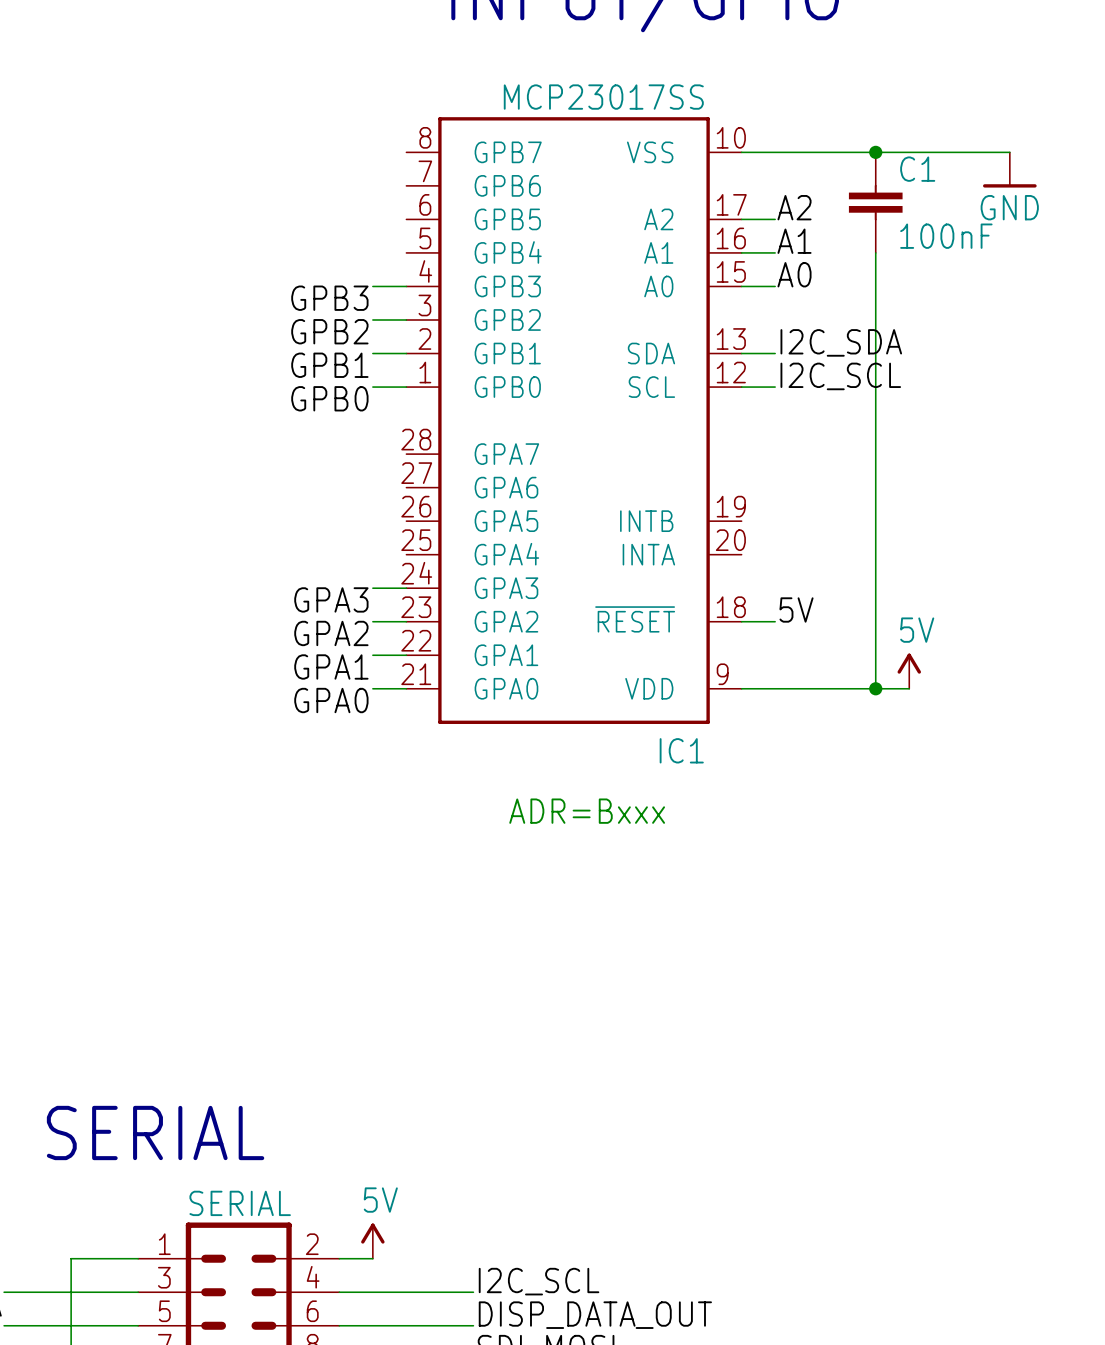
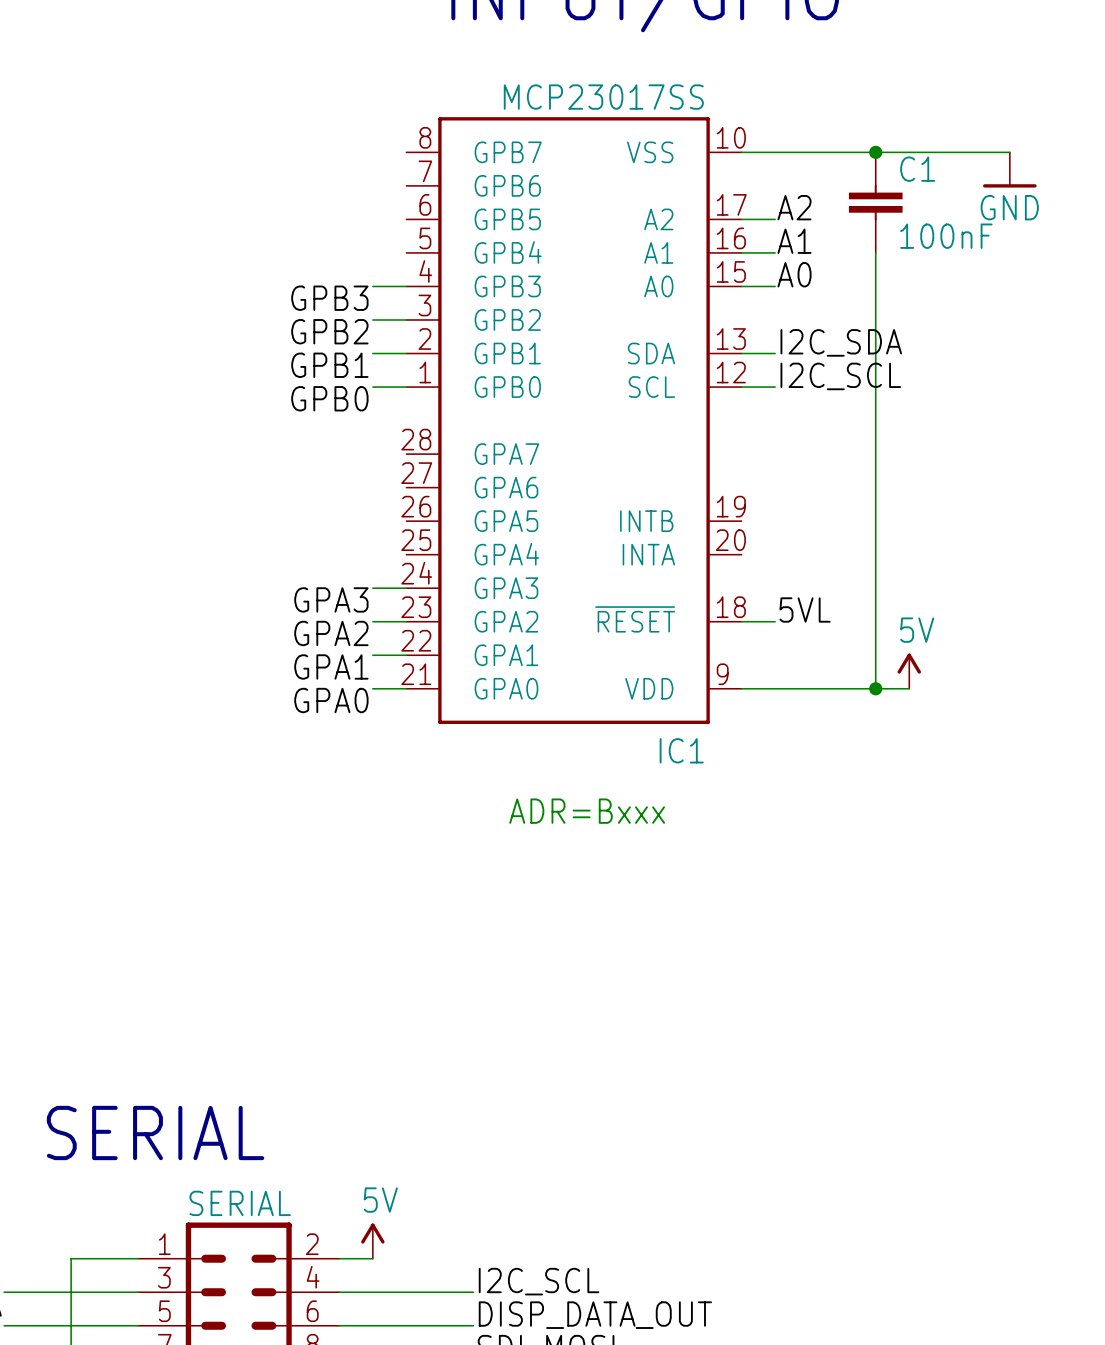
label: 5V (796, 609) -> 5VL (805, 609)

